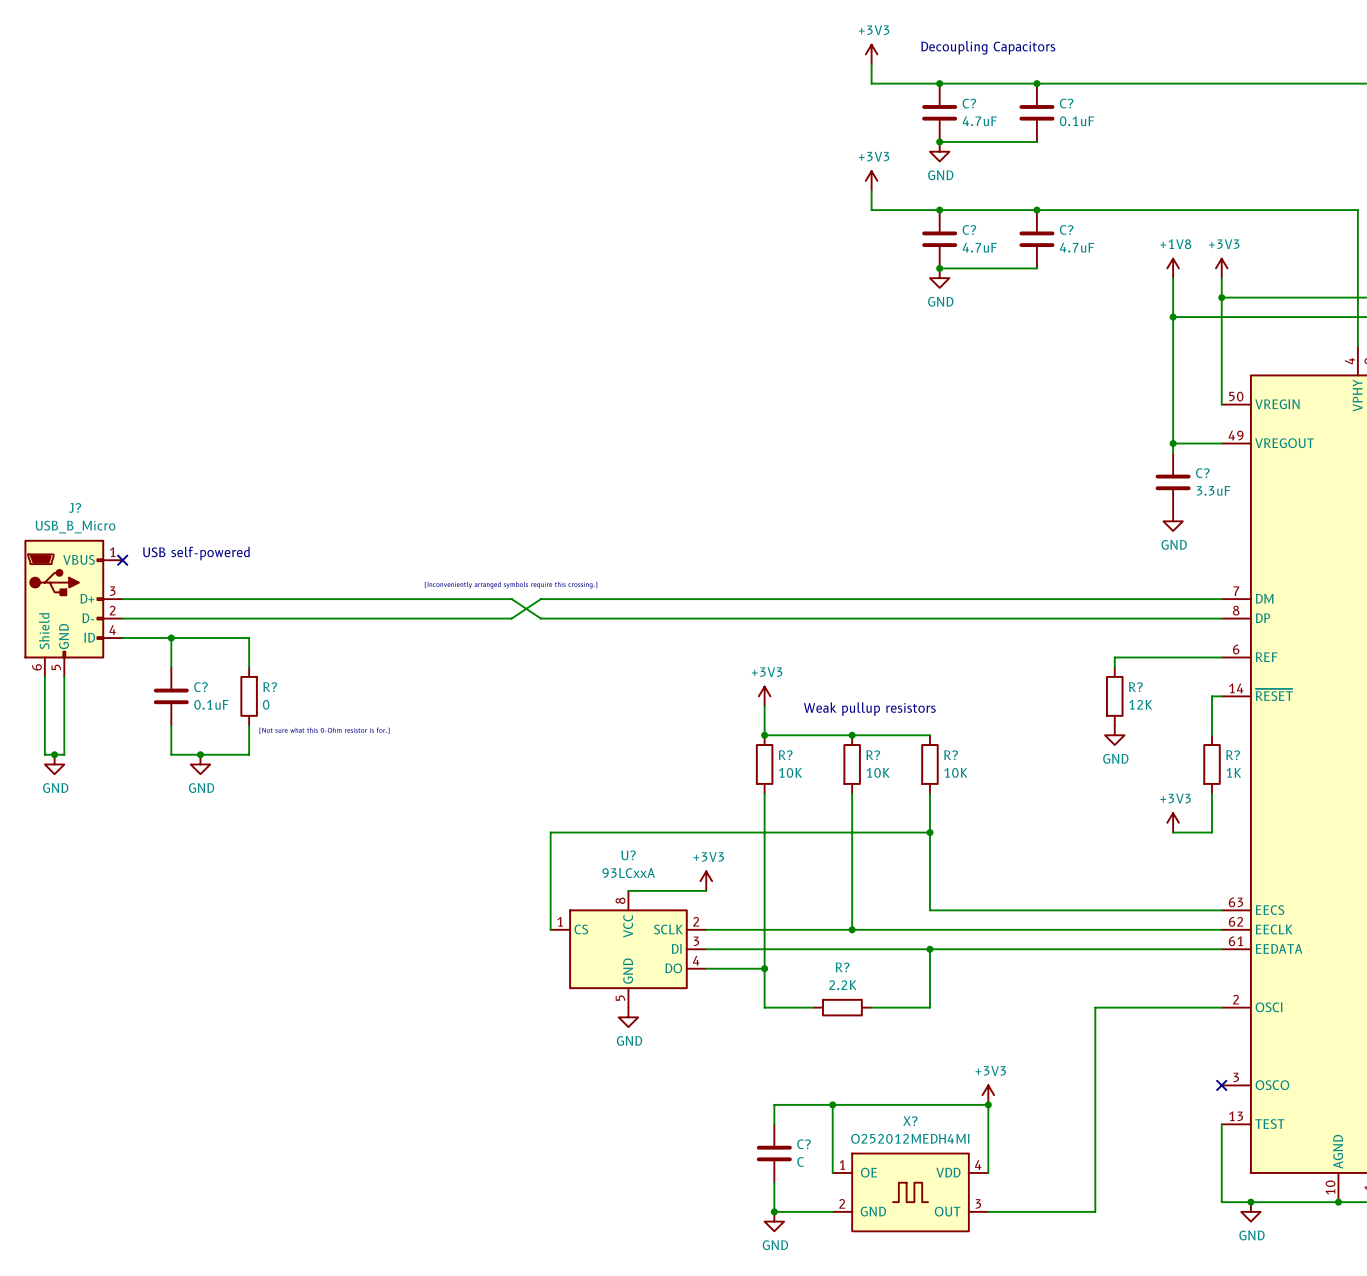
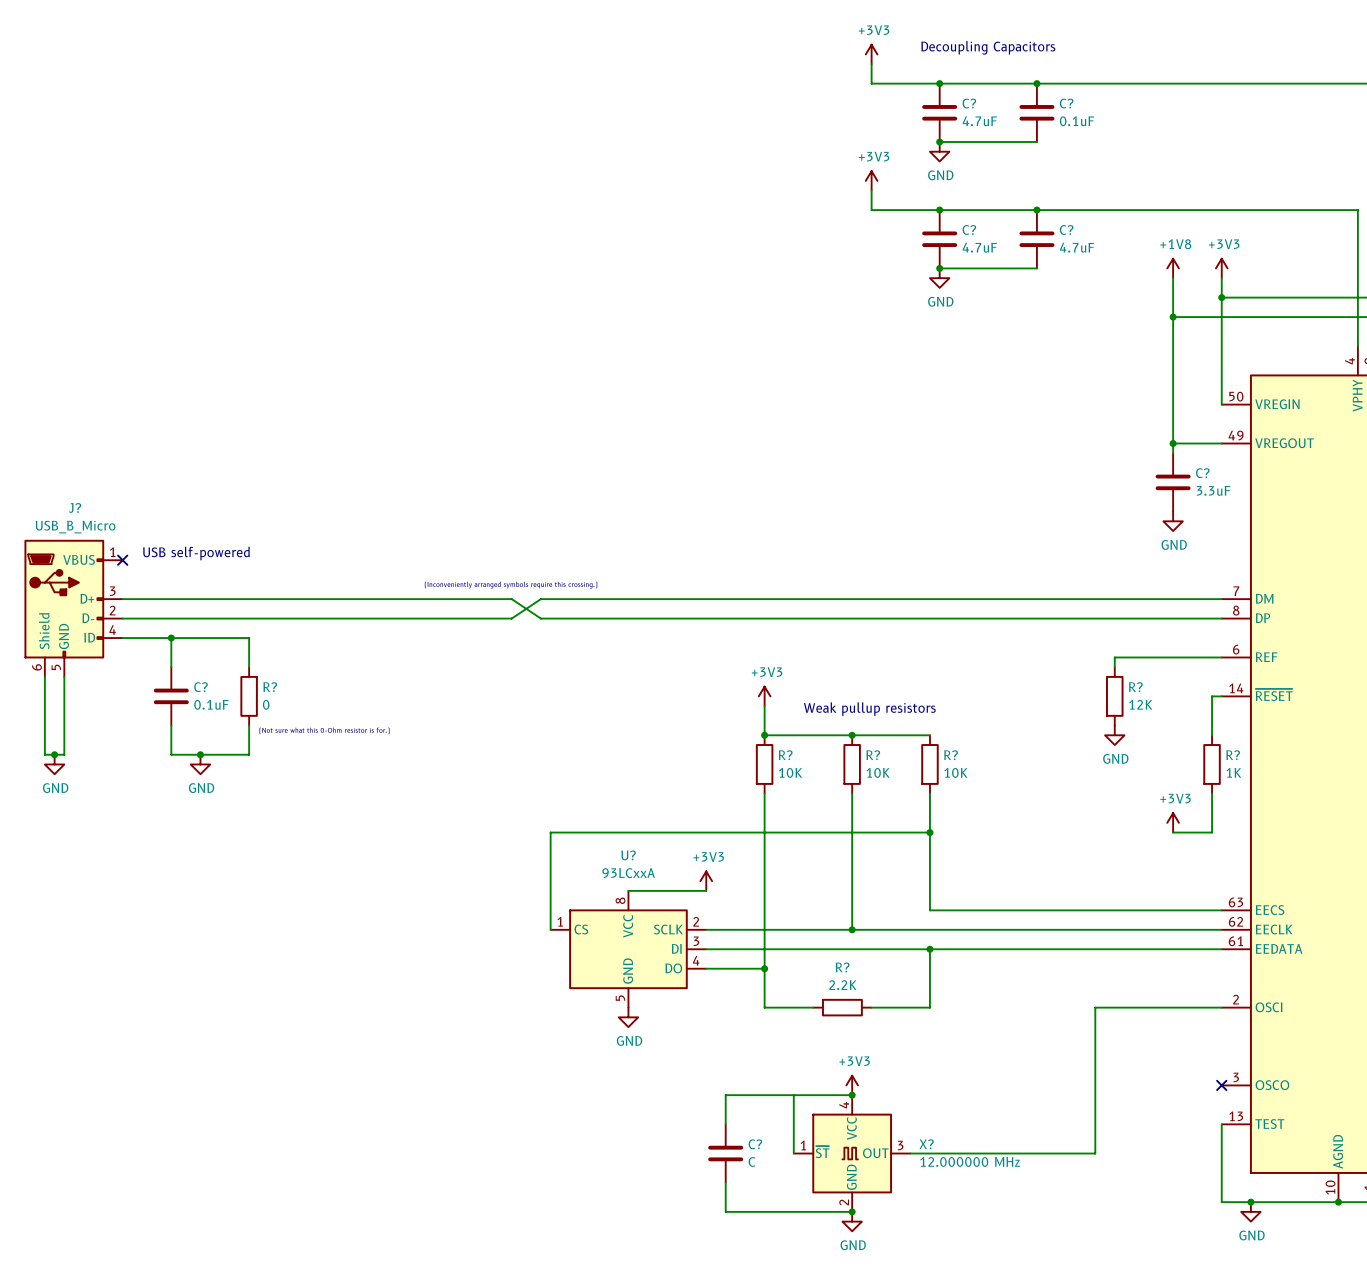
wire: none -> (793, 1095) (793, 1153)
wire: none -> (852, 1095) (725, 1095) (725, 1124)
power symbol position: +3V3 (988, 1095) -> +3V3 (852, 1085)
junction position: (832, 1104) -> (852, 1095)
junction: (988, 1104) -> none
wire: (774, 1124) (774, 1104) (988, 1104) (988, 1172) -> none
C? position: (774, 1153) -> (725, 1153)
X?: none -> 12.000000 MHz (852, 1153)
wire: (1095, 1153) (1095, 1211) (988, 1211) -> (1095, 1153) (910, 1153)
wire: (774, 1182) (774, 1211) -> (725, 1182) (725, 1211) (774, 1211)
X?: O252012MEDH4MI (910, 1192) -> none
junction: (774, 1211) -> none
junction: none -> (852, 1211)
power symbol position: GND (774, 1221) -> GND (852, 1221)

